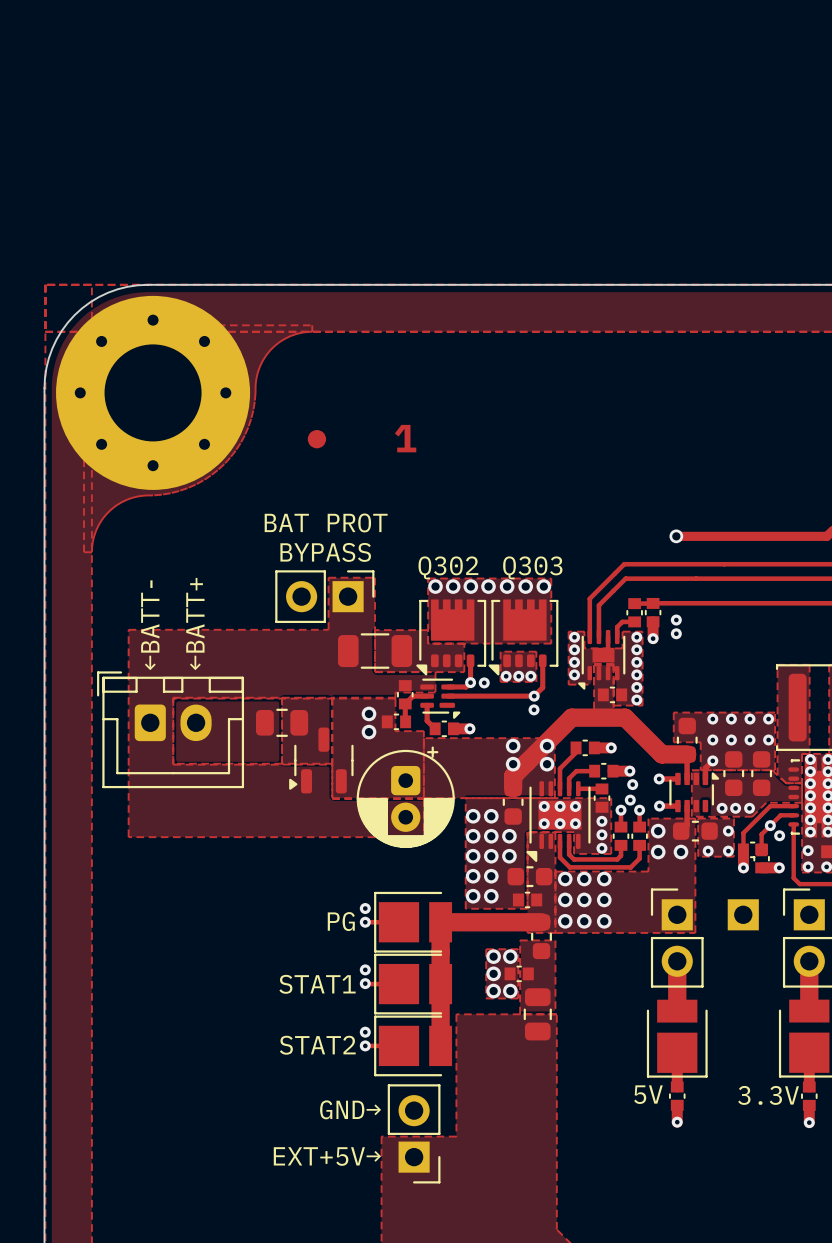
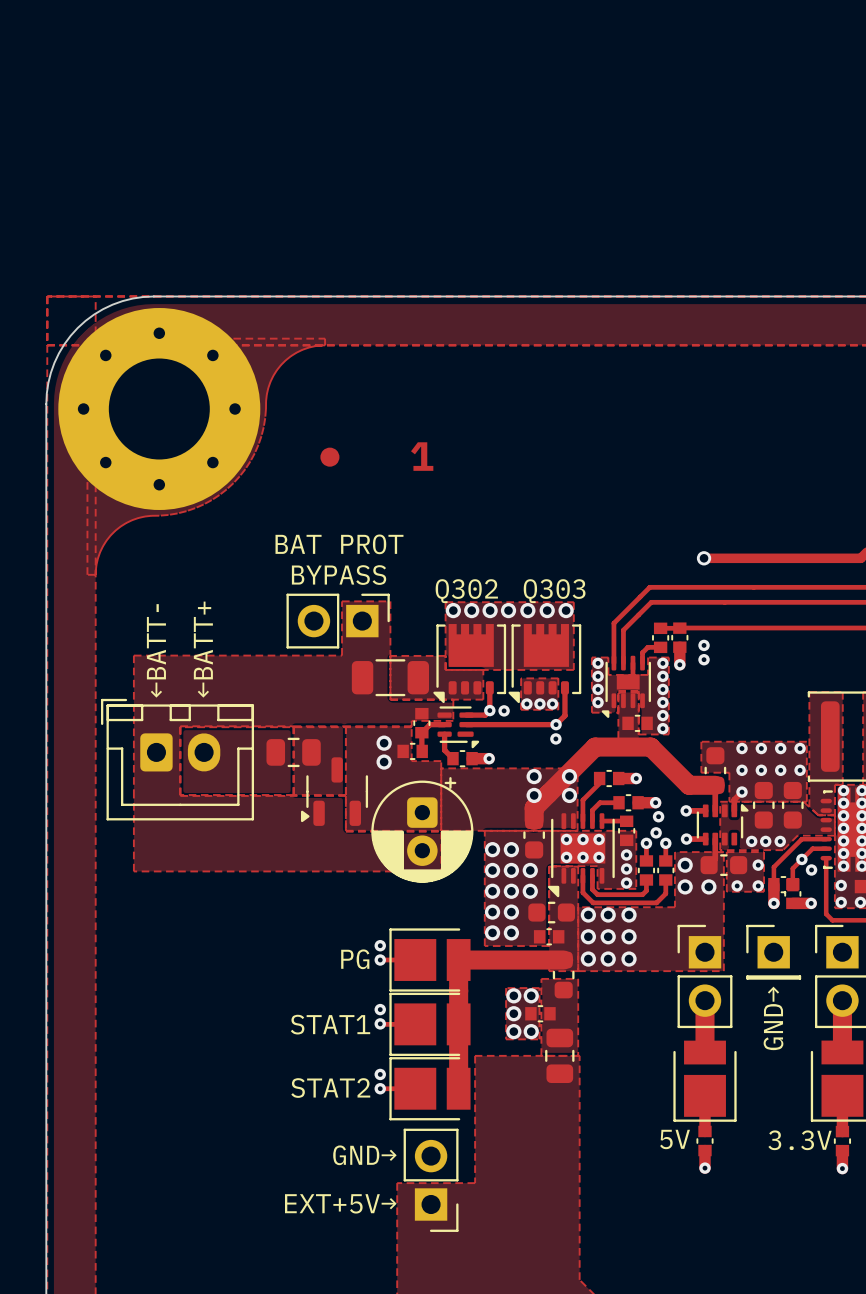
part side: bottom (743, 914) -> top (773, 952)
text: none -> GND→ (773, 1018)

